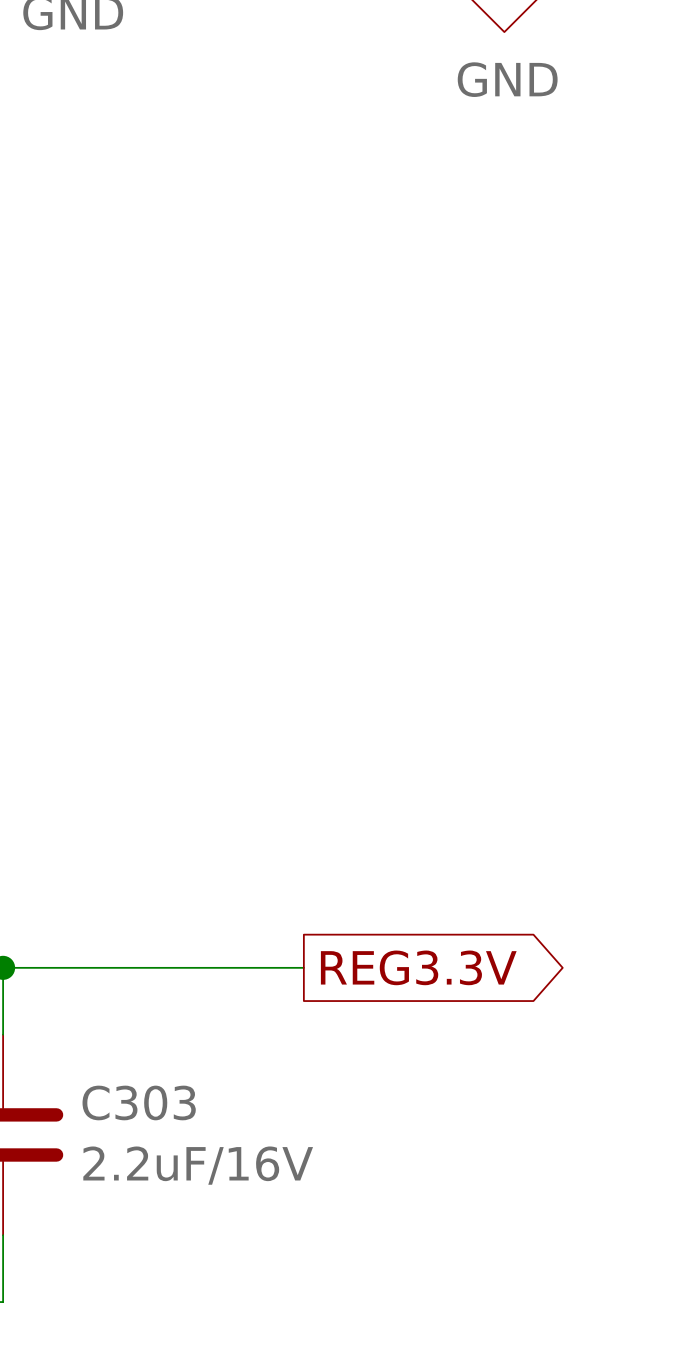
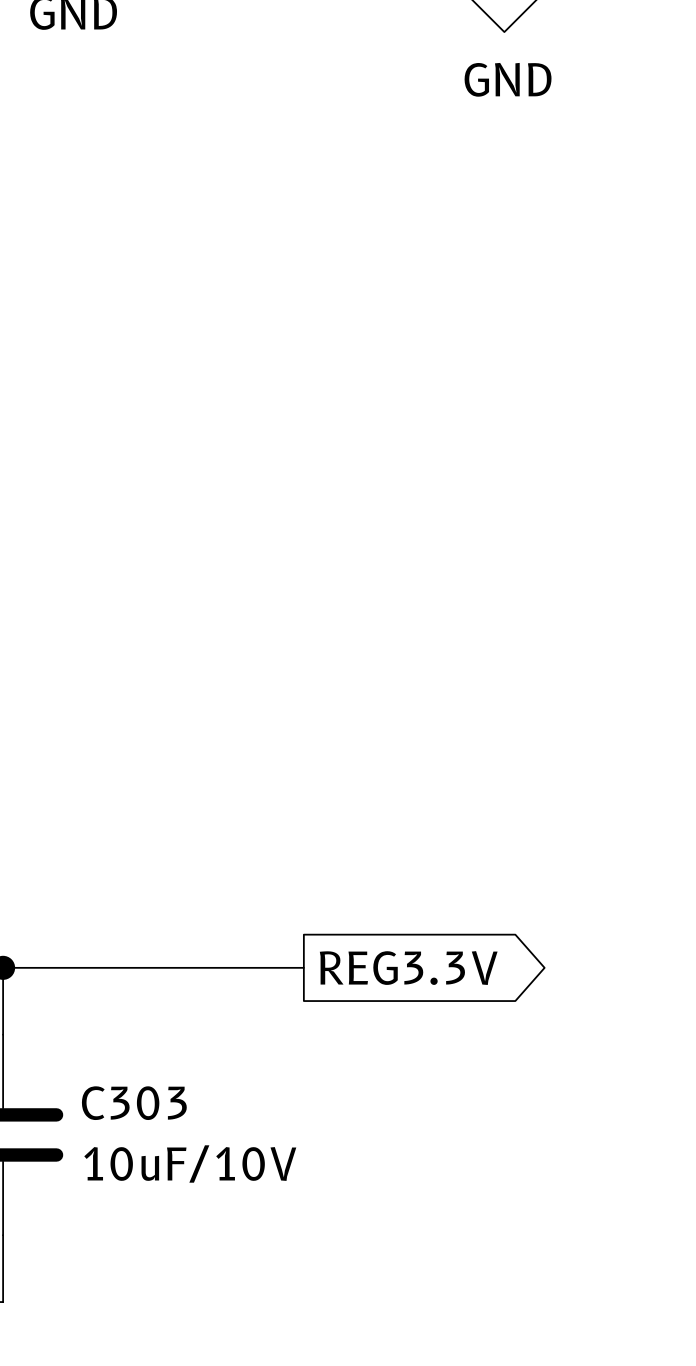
C303 value: 2.2uF/16V (198, 1165) -> 10uF/10V (190, 1164)

